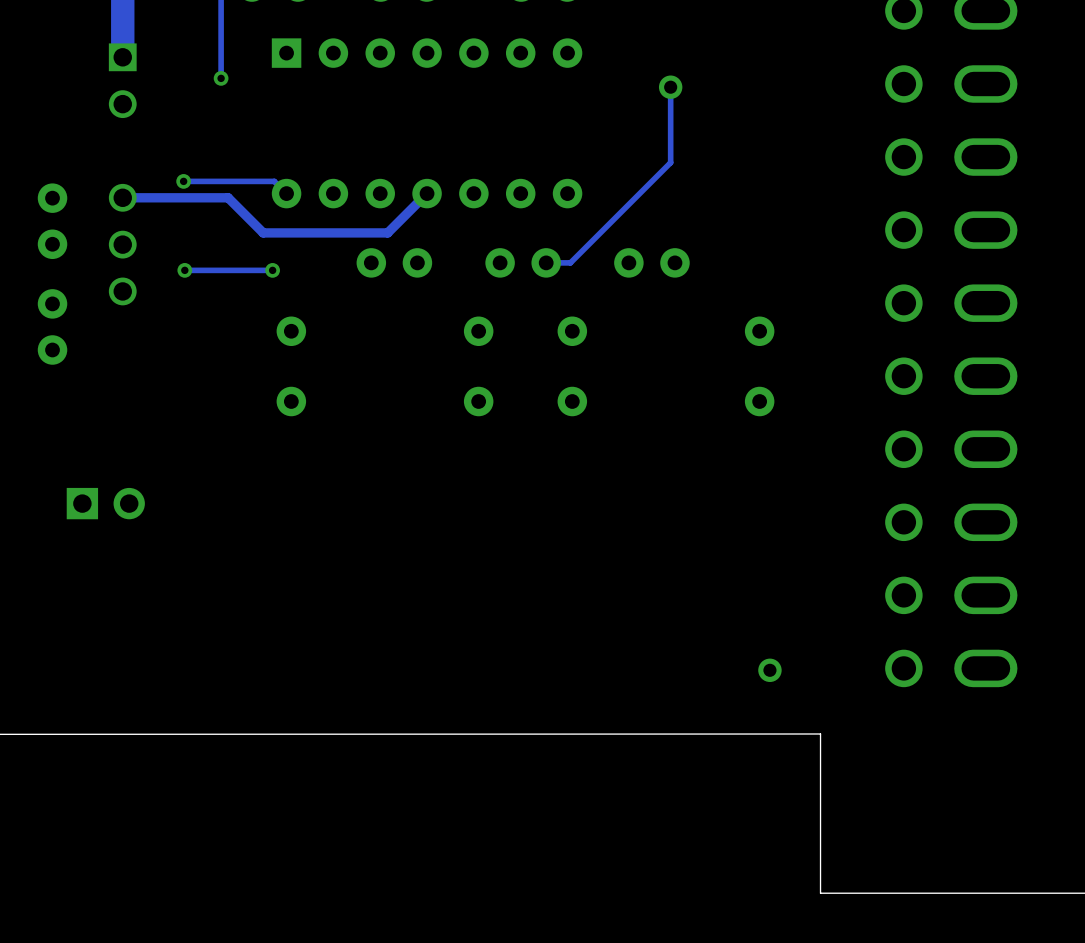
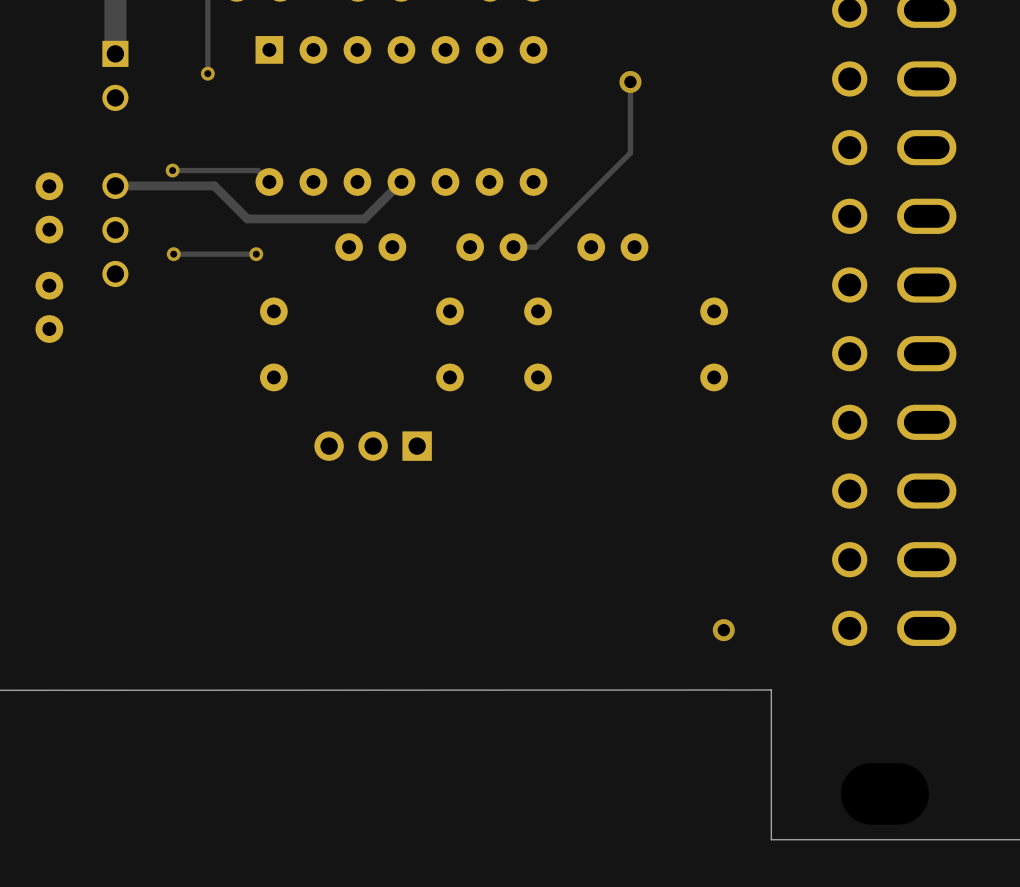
part: none -> (373, 446)
part: (105, 503) -> none

